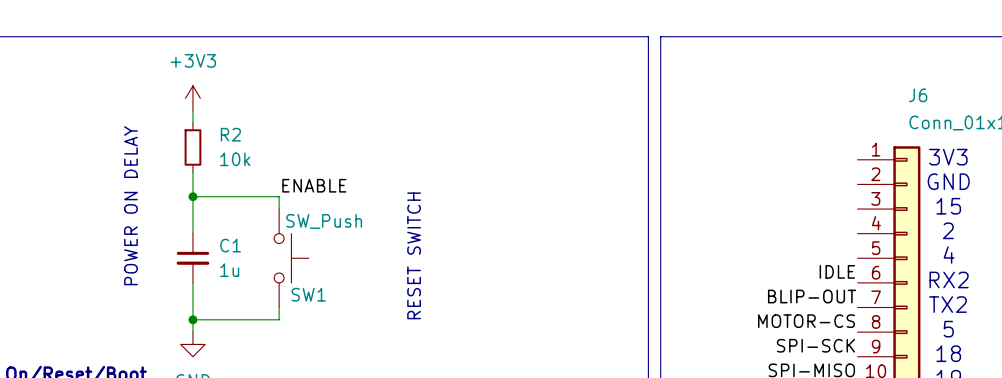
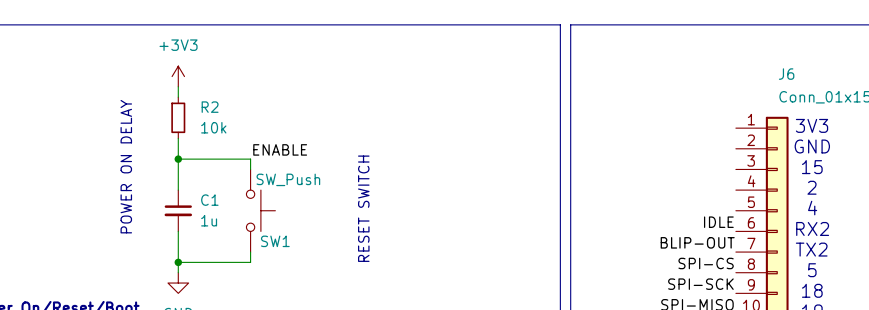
label: MOTOR-CS (806, 321) -> SPI-CS (706, 263)

